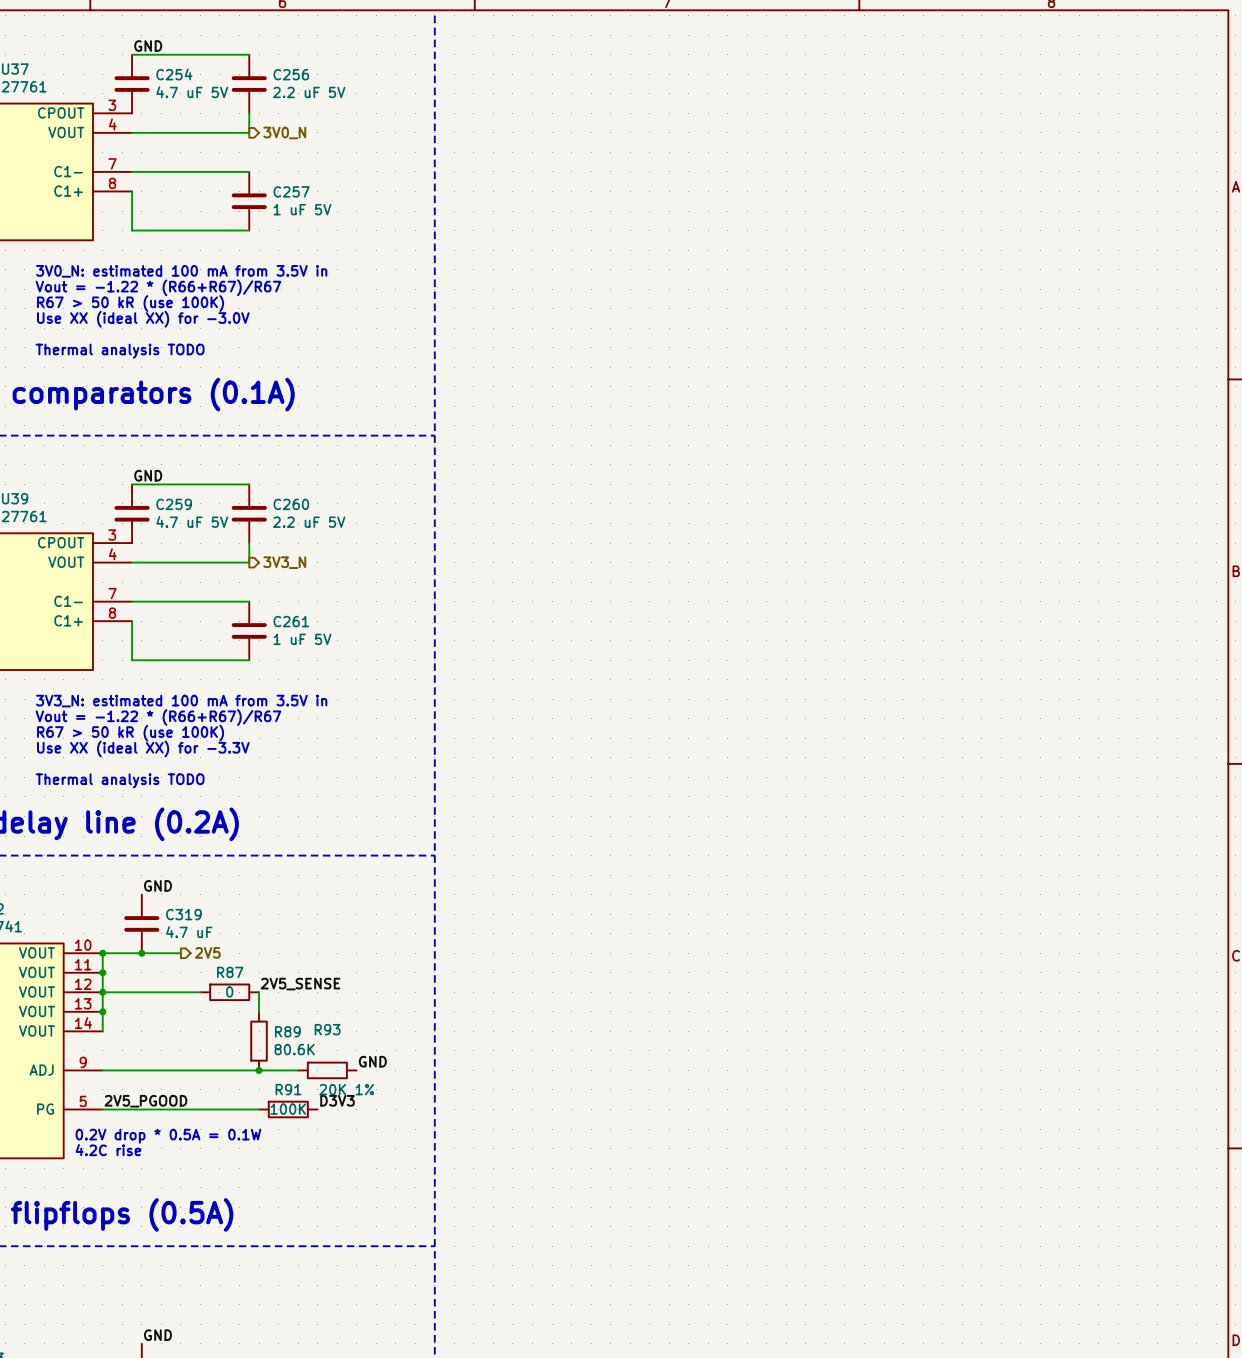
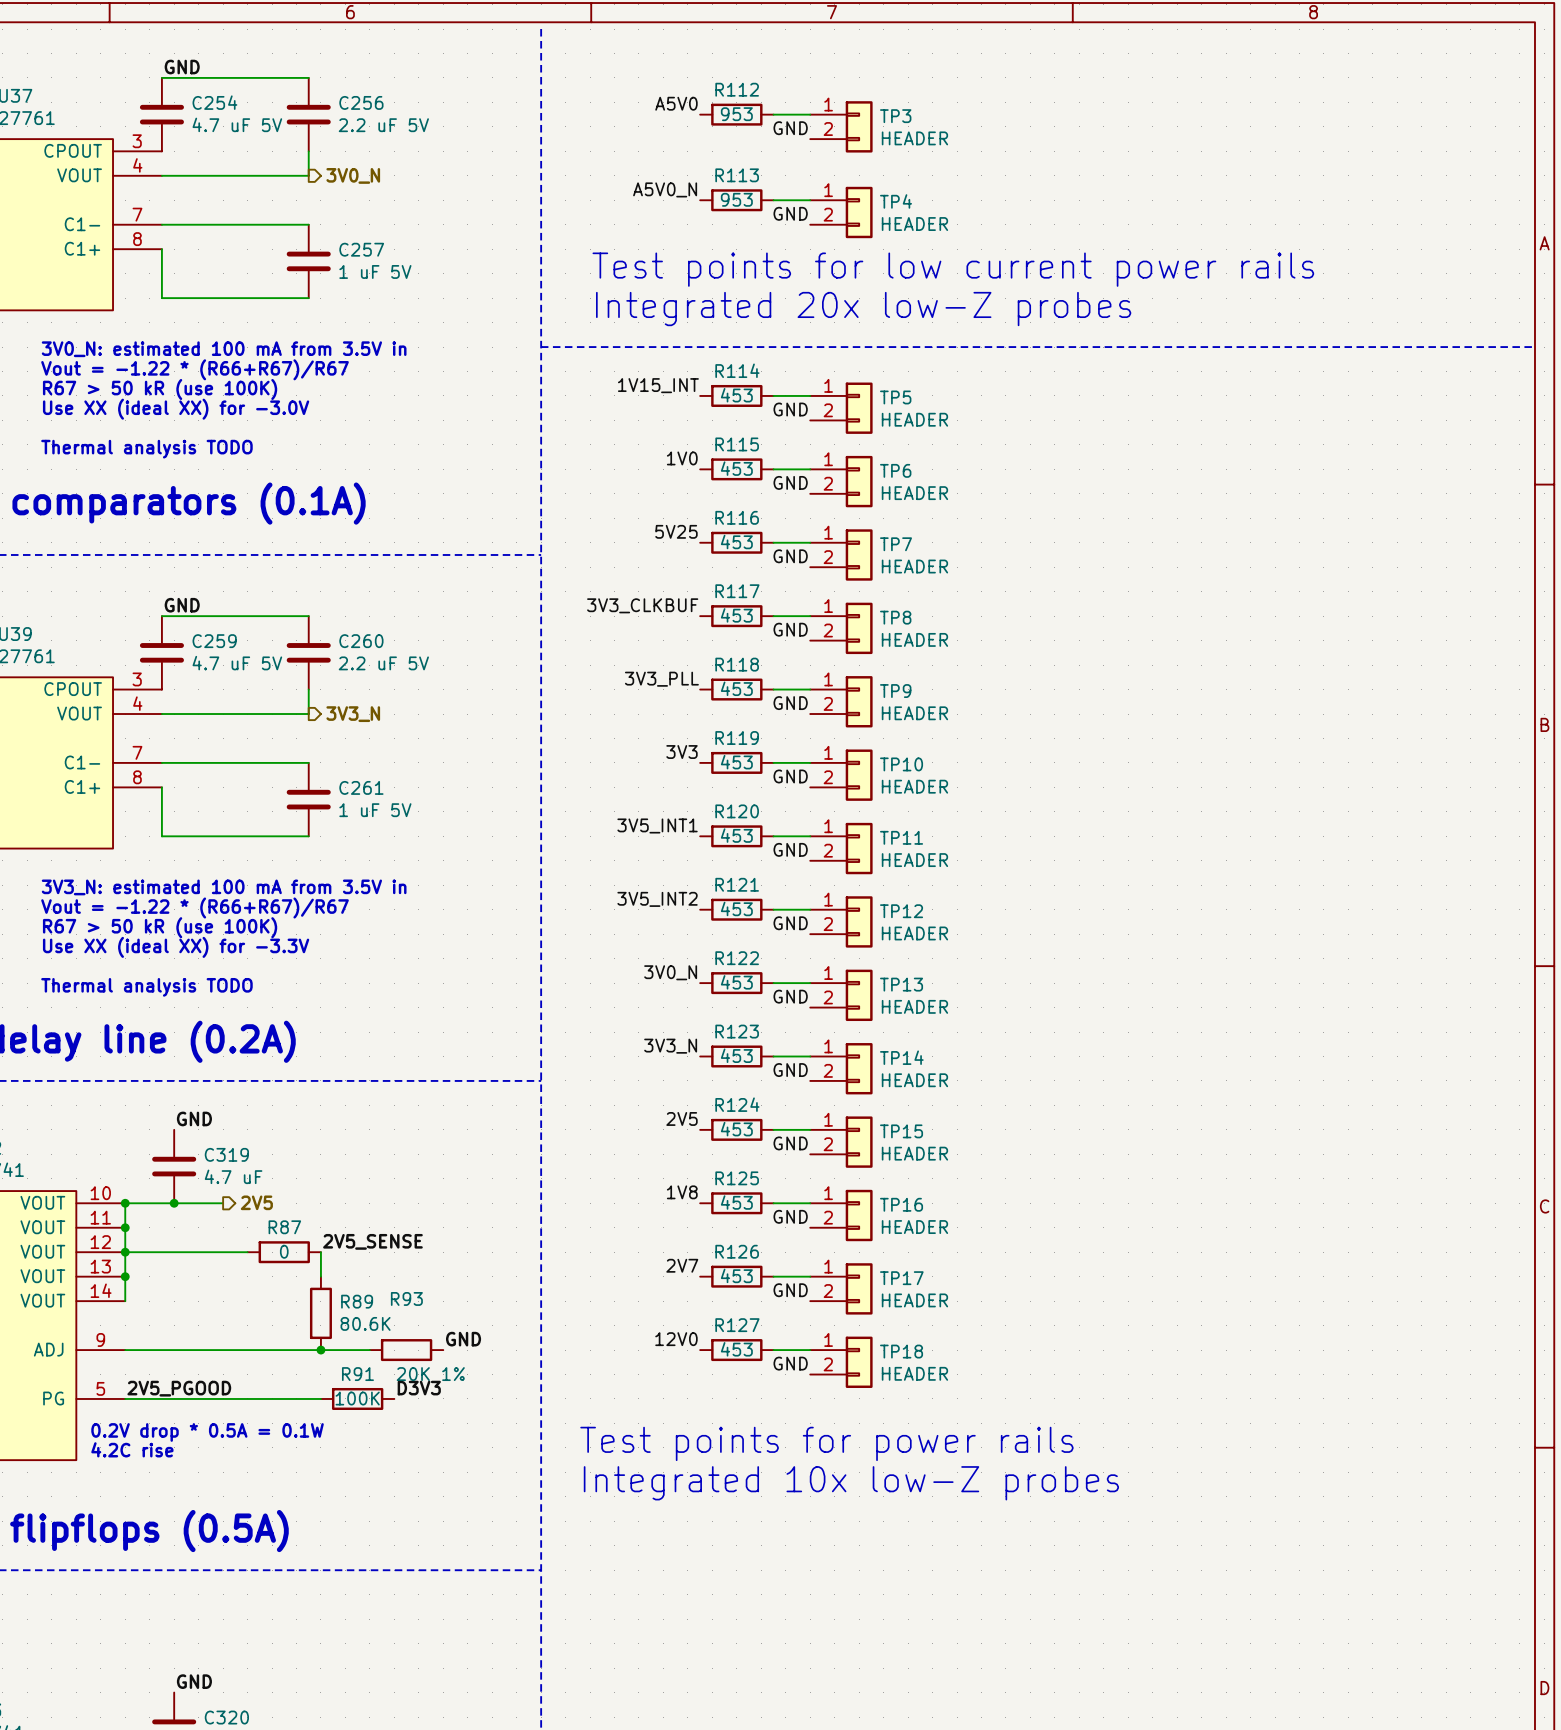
label: none -> A5V0 (676, 103)
R112: none -> 953 (736, 114)
wire: none -> (773, 114) (810, 114)
TP3: none -> HEADER (841, 126)
label: none -> GND (790, 128)
label: none -> A5V0_N (665, 189)
R113: none -> 953 (736, 200)
wire: none -> (773, 200) (810, 200)
TP4: none -> HEADER (841, 212)
label: none -> GND (790, 213)
text: none -> Test points for low current power rails (953, 269)
text: none -> Integrated 20x low-Z probes (863, 309)
line: none -> (541, 347) (1531, 347)
label: none -> 1V15_INT (658, 385)
R114: none -> 453 (736, 395)
wire: none -> (773, 395) (810, 395)
TP5: none -> HEADER (841, 408)
label: none -> GND (790, 409)
label: none -> 1V0 (682, 458)
R115: none -> 453 (736, 469)
wire: none -> (773, 469) (810, 469)
TP6: none -> HEADER (841, 481)
label: none -> GND (790, 482)
label: none -> 5V25 (676, 531)
R116: none -> 453 (736, 542)
wire: none -> (773, 542) (810, 542)
TP7: none -> HEADER (841, 554)
label: none -> GND (790, 556)
label: none -> 3V3_CLKBUF (642, 605)
R117: none -> 453 (736, 616)
wire: none -> (773, 616) (810, 616)
TP8: none -> HEADER (841, 628)
label: none -> GND (790, 629)
label: none -> 3V3_PLL (661, 679)
R118: none -> 453 (736, 689)
wire: none -> (773, 689) (810, 689)
TP9: none -> HEADER (841, 701)
label: none -> GND (790, 703)
label: none -> 3V3 (682, 752)
R119: none -> 453 (736, 762)
wire: none -> (773, 762) (810, 762)
TP10: none -> HEADER (841, 775)
label: none -> GND (790, 776)
label: none -> 3V5_INT1 (657, 825)
R120: none -> 453 (736, 836)
wire: none -> (773, 836) (810, 836)
TP11: none -> HEADER (841, 848)
label: none -> GND (790, 849)
label: none -> 3V5_INT2 (657, 899)
R121: none -> 453 (736, 909)
wire: none -> (773, 909) (810, 909)
TP12: none -> HEADER (841, 921)
label: none -> GND (790, 923)
label: none -> 3V0_N (670, 972)
R122: none -> 453 (736, 983)
wire: none -> (773, 983) (810, 983)
TP13: none -> HEADER (841, 995)
label: none -> GND (790, 996)
label: none -> 3V3_N (670, 1046)
R123: none -> 453 (736, 1056)
wire: none -> (773, 1056) (810, 1056)
TP14: none -> HEADER (841, 1068)
label: none -> GND (790, 1070)
label: none -> 2V5 (682, 1118)
R124: none -> 453 (736, 1129)
wire: none -> (773, 1129) (810, 1129)
TP15: none -> HEADER (841, 1142)
label: none -> GND (790, 1143)
label: none -> 1V8 (682, 1192)
R125: none -> 453 (736, 1203)
wire: none -> (773, 1203) (810, 1203)
TP16: none -> HEADER (841, 1215)
label: none -> GND (790, 1216)
label: none -> 2V7 (682, 1265)
R126: none -> 453 (736, 1276)
wire: none -> (773, 1276) (810, 1276)
TP17: none -> HEADER (841, 1288)
label: none -> GND (790, 1290)
label: none -> 12V0 (676, 1339)
R127: none -> 453 (736, 1350)
wire: none -> (773, 1350) (810, 1350)
TP18: none -> HEADER (841, 1362)
label: none -> GND (790, 1363)
text: none -> Test points for power rails (826, 1443)
text: none -> Integrated 10x low-Z probes (851, 1483)

